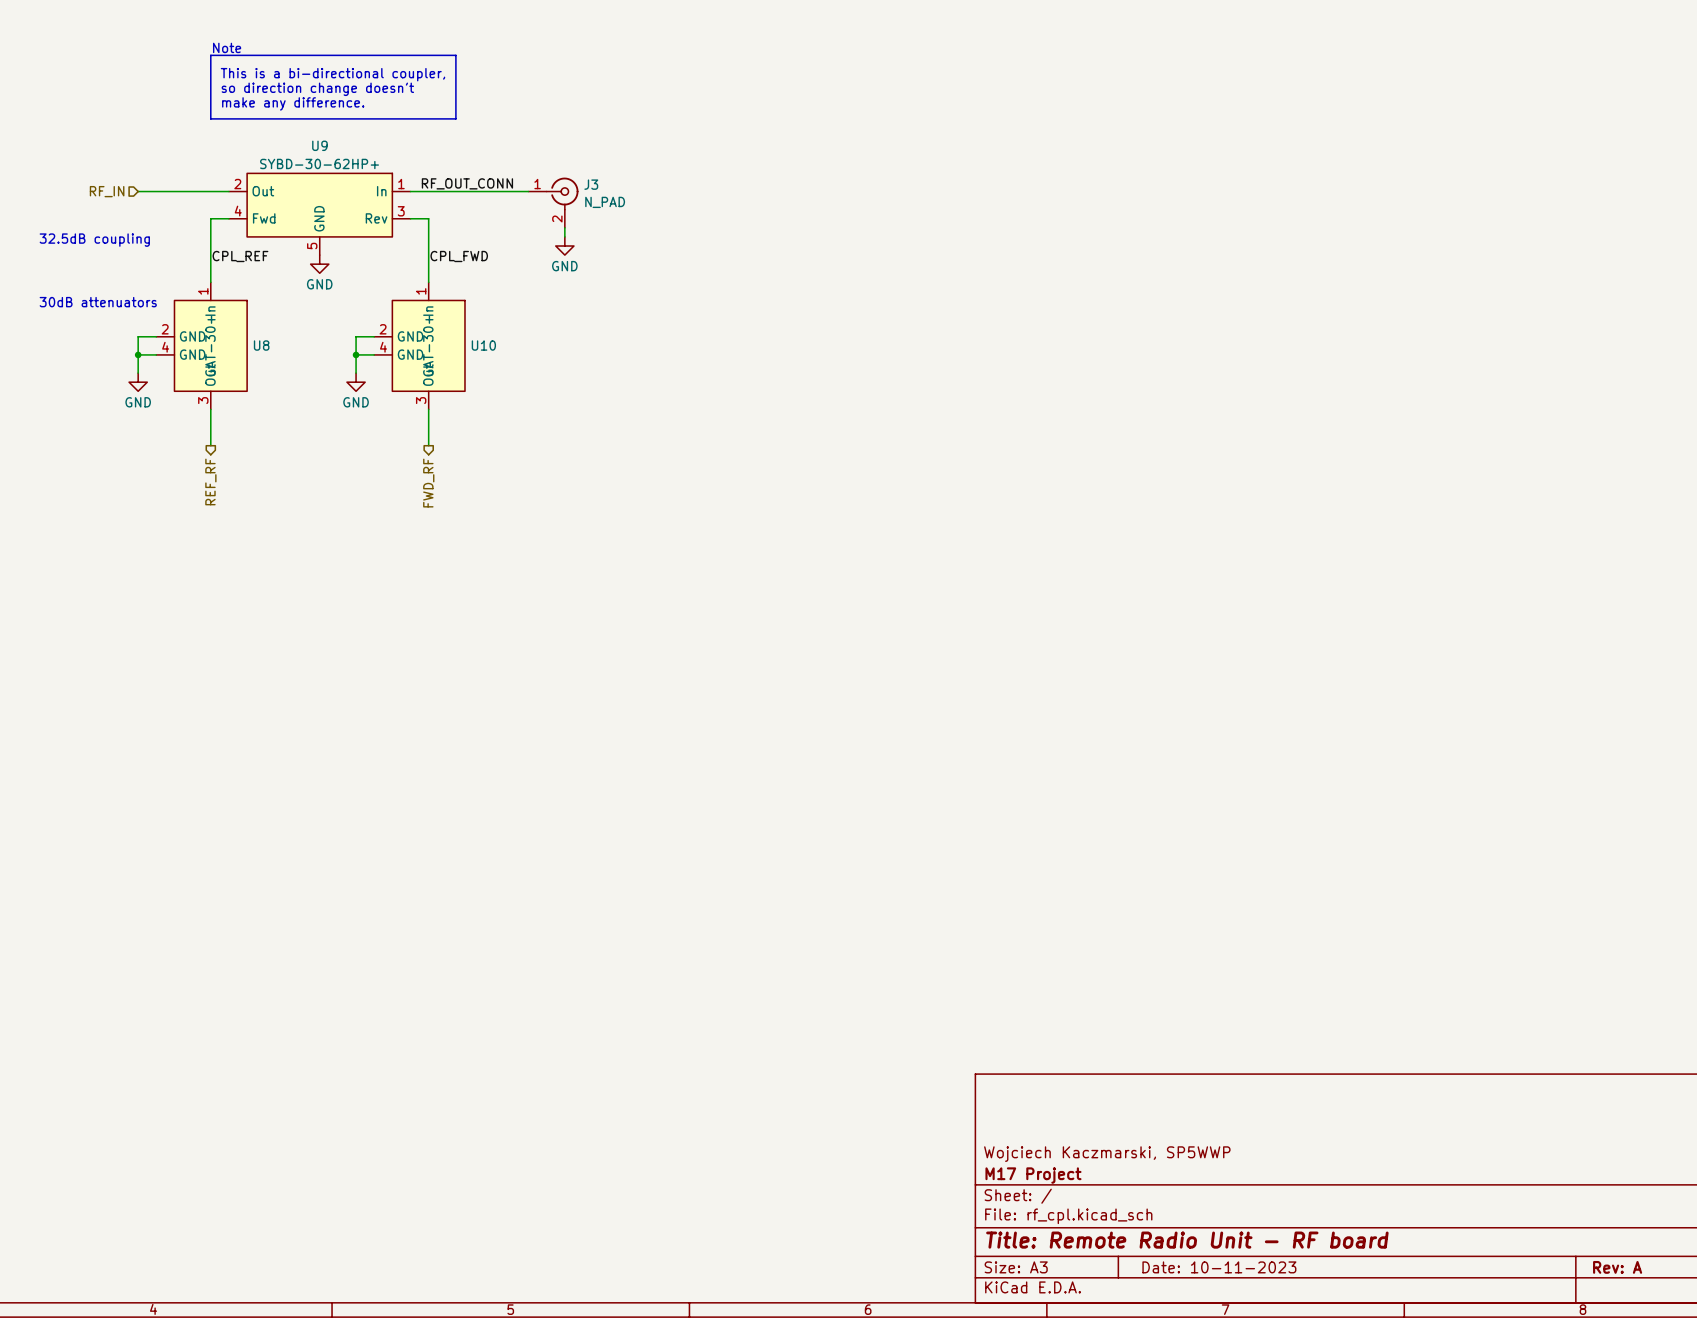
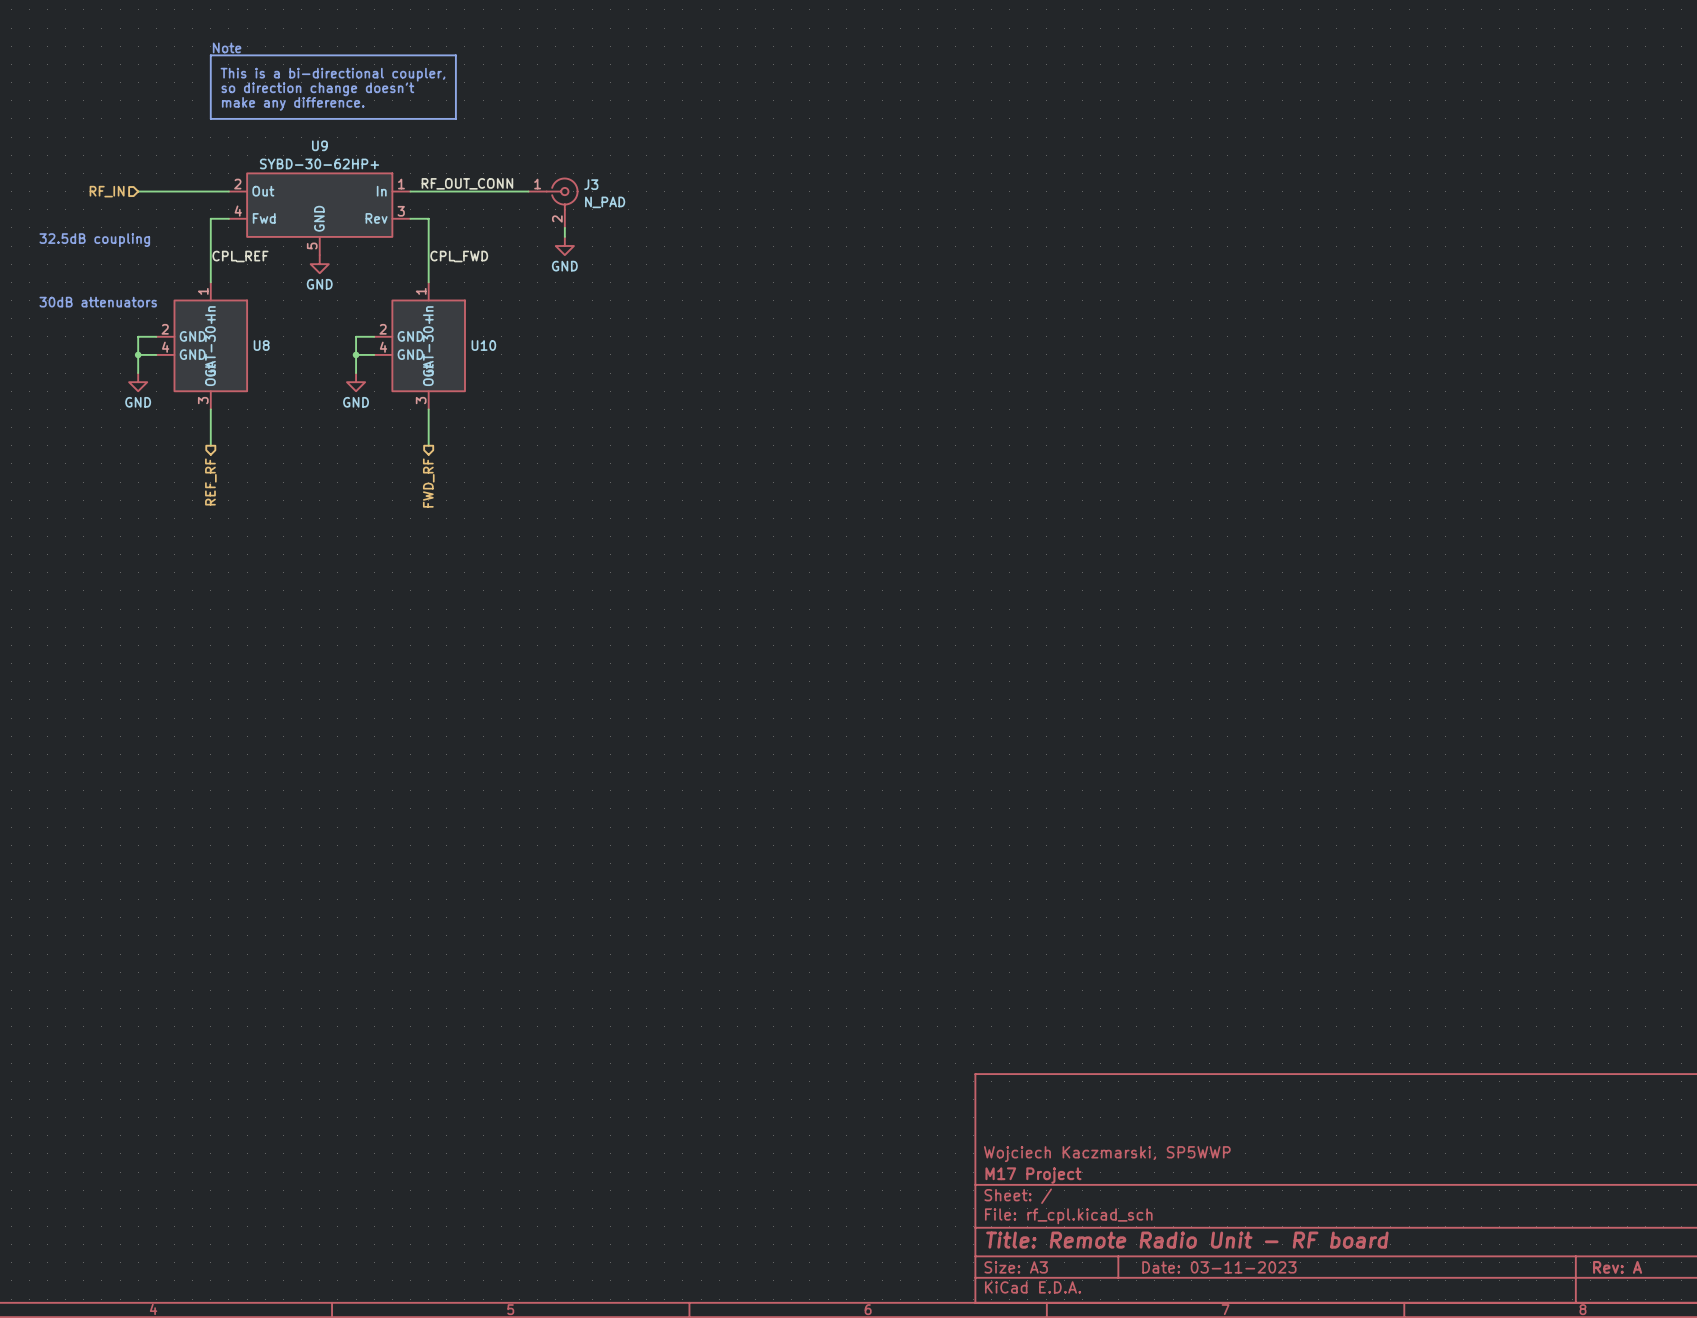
title block: Date: 10-11-2023 (1219, 1267) -> Date: 03-11-2023 (1219, 1267)

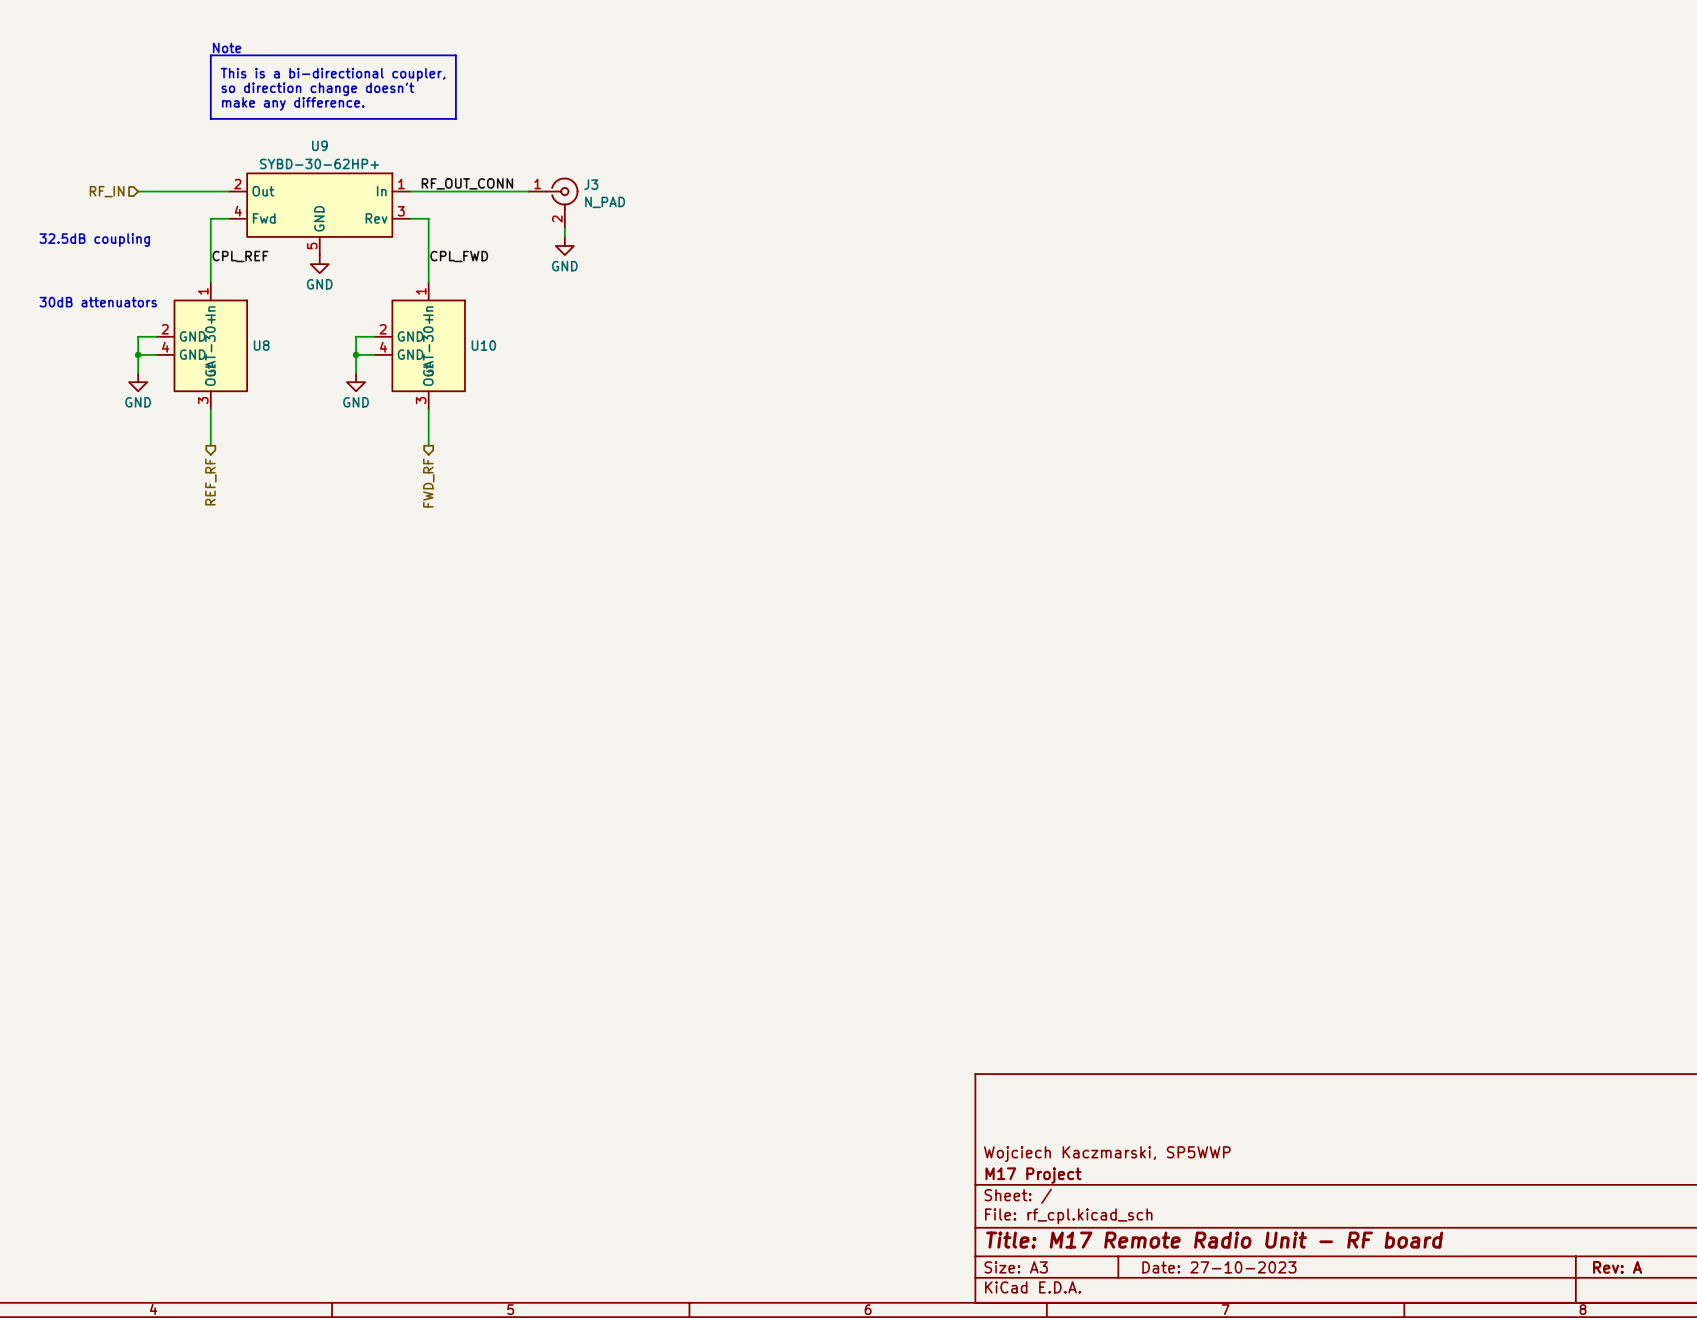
title block: Title: Remote Radio Unit - RF board (1187, 1240) -> Title: M17 Remote Radio Unit - RF board (1214, 1240)
title block: Date: 03-11-2023 (1219, 1267) -> Date: 27-10-2023 (1219, 1267)

